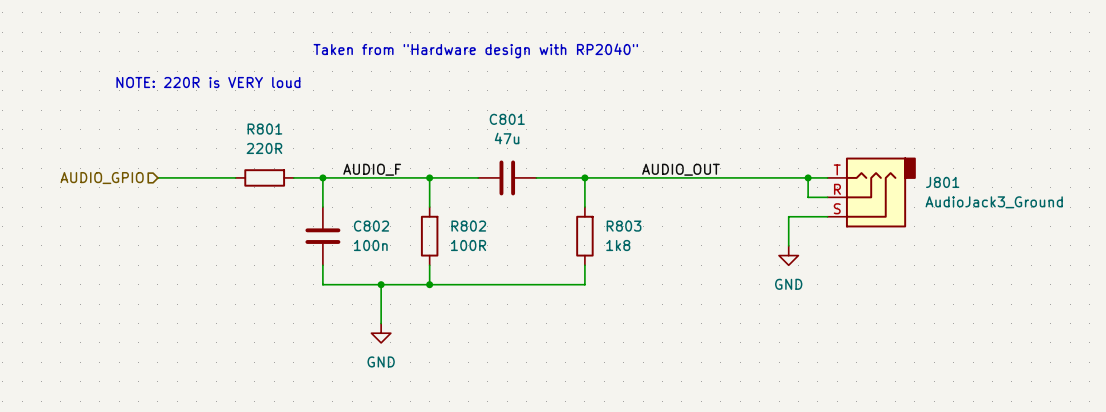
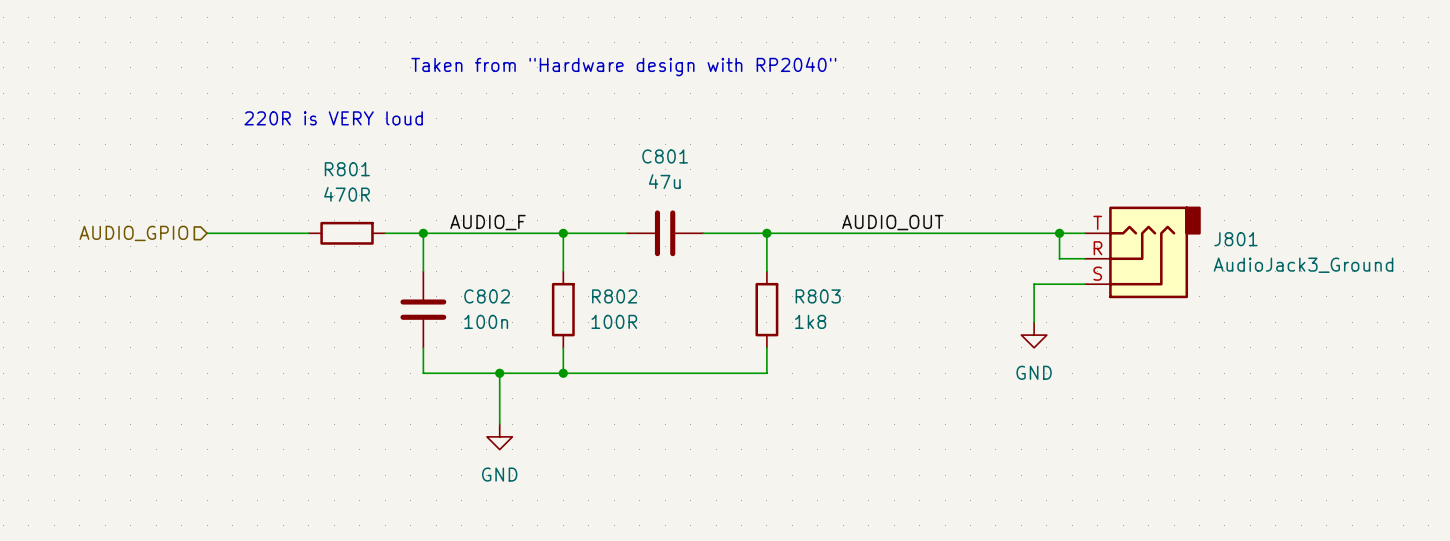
text: NOTE: 220R is VERY loud (208, 82) -> 220R is VERY loud (333, 118)
R801 value: 220R (264, 148) -> 470R (347, 194)

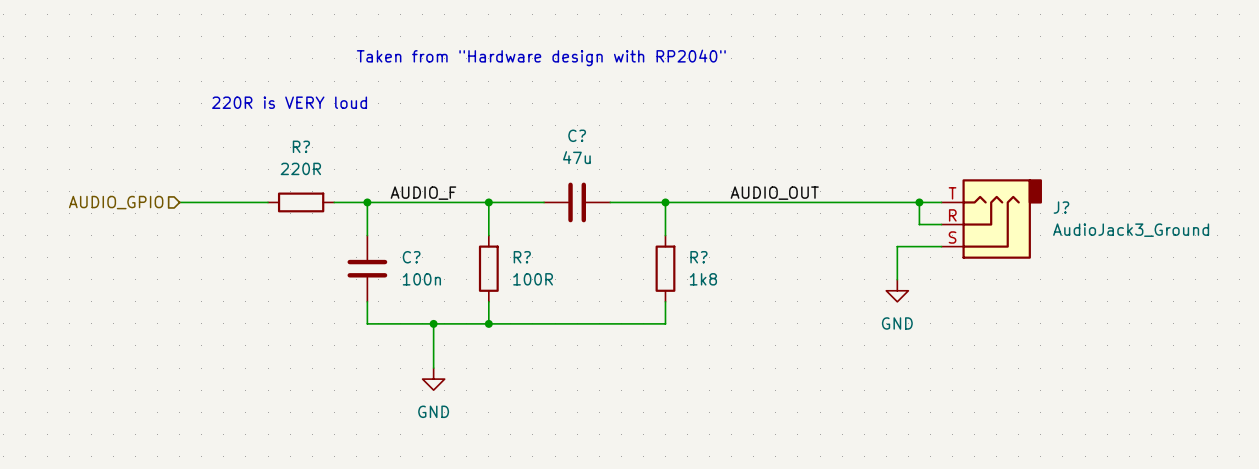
C801 name: C801 (665, 156) -> C? (577, 135)
R801 name: R801 (347, 169) -> R? (301, 146)
R801 value: 470R (347, 194) -> 220R (300, 168)
J801 name: J801 (1235, 239) -> J? (1061, 207)
C802 name: C802 (487, 296) -> C? (411, 257)
R802 name: R802 (614, 296) -> R? (522, 257)
R803 name: R803 (818, 296) -> R? (698, 257)

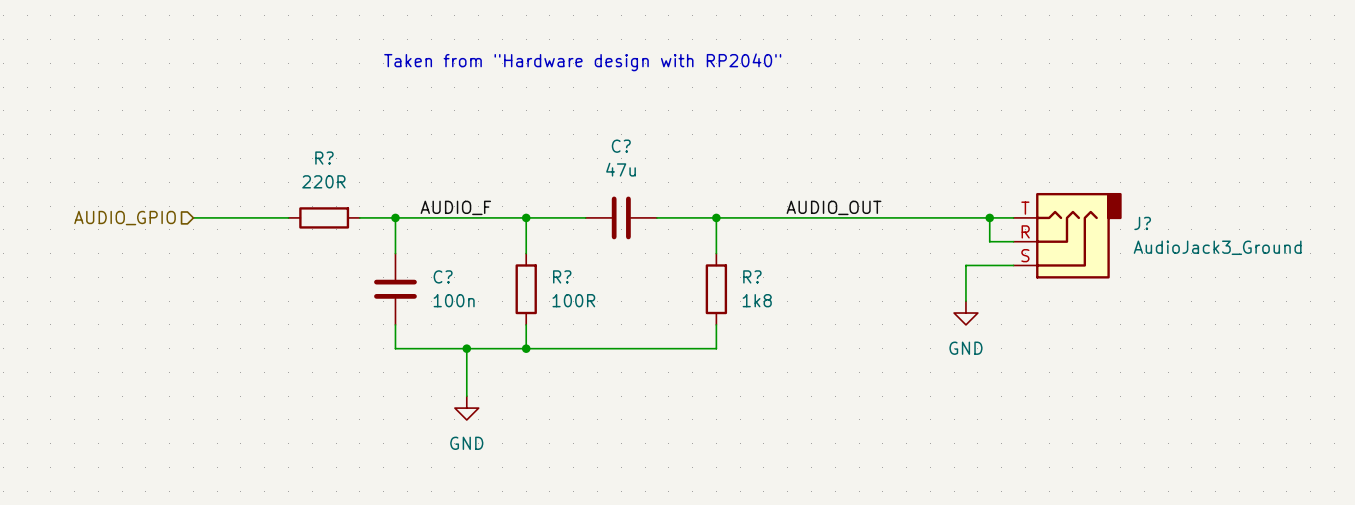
text: 220R is VERY loud (289, 102) -> none

